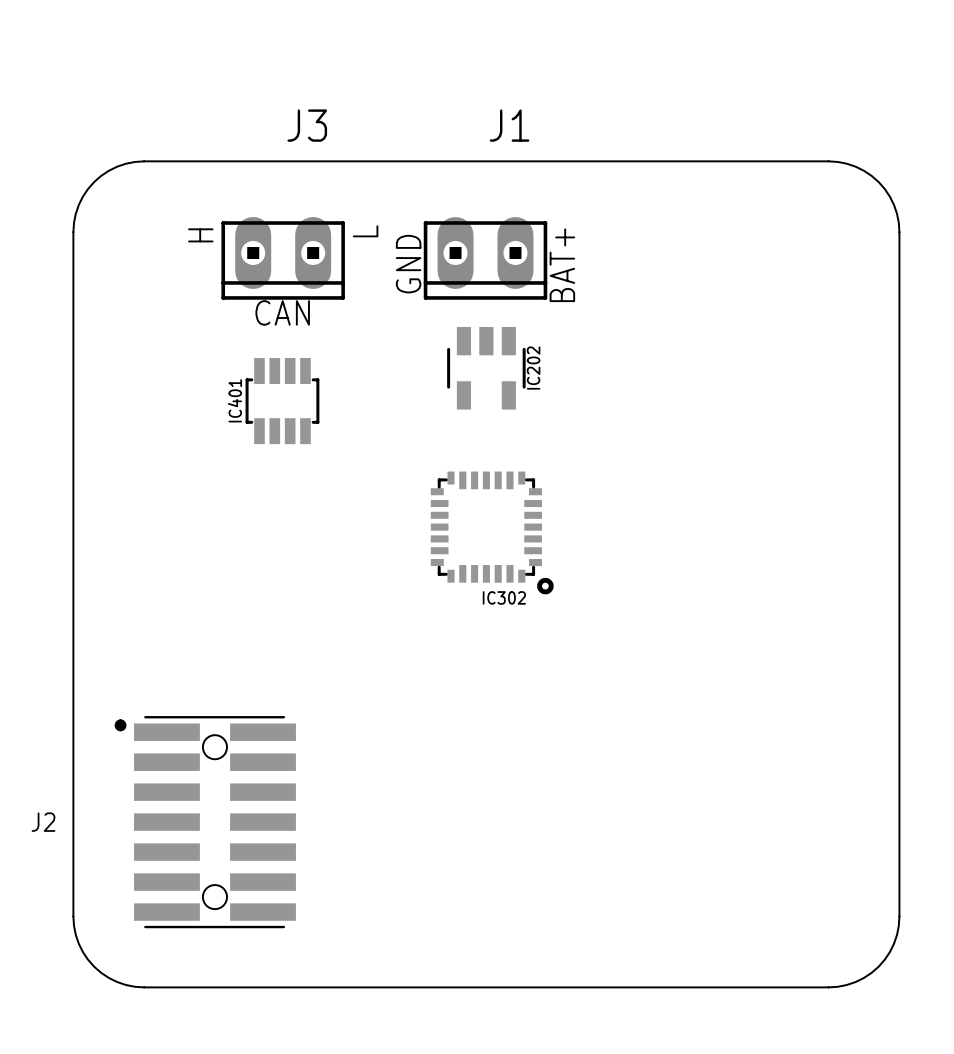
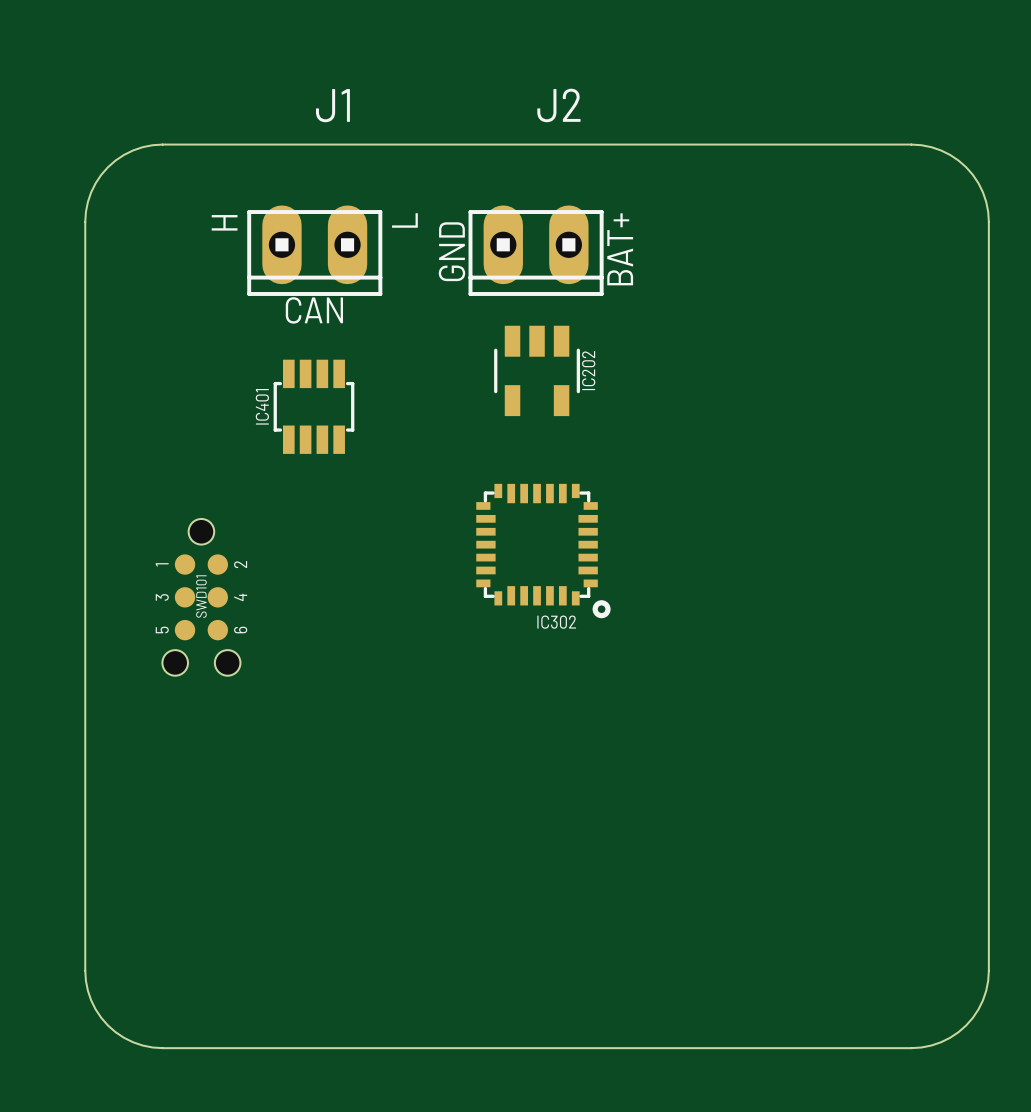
J3 name: J3 (307, 125) -> J1 (332, 105)
J1 name: J1 (509, 125) -> J2 (558, 105)
SWD101: none -> (201, 597)
J2: (205, 822) -> none

